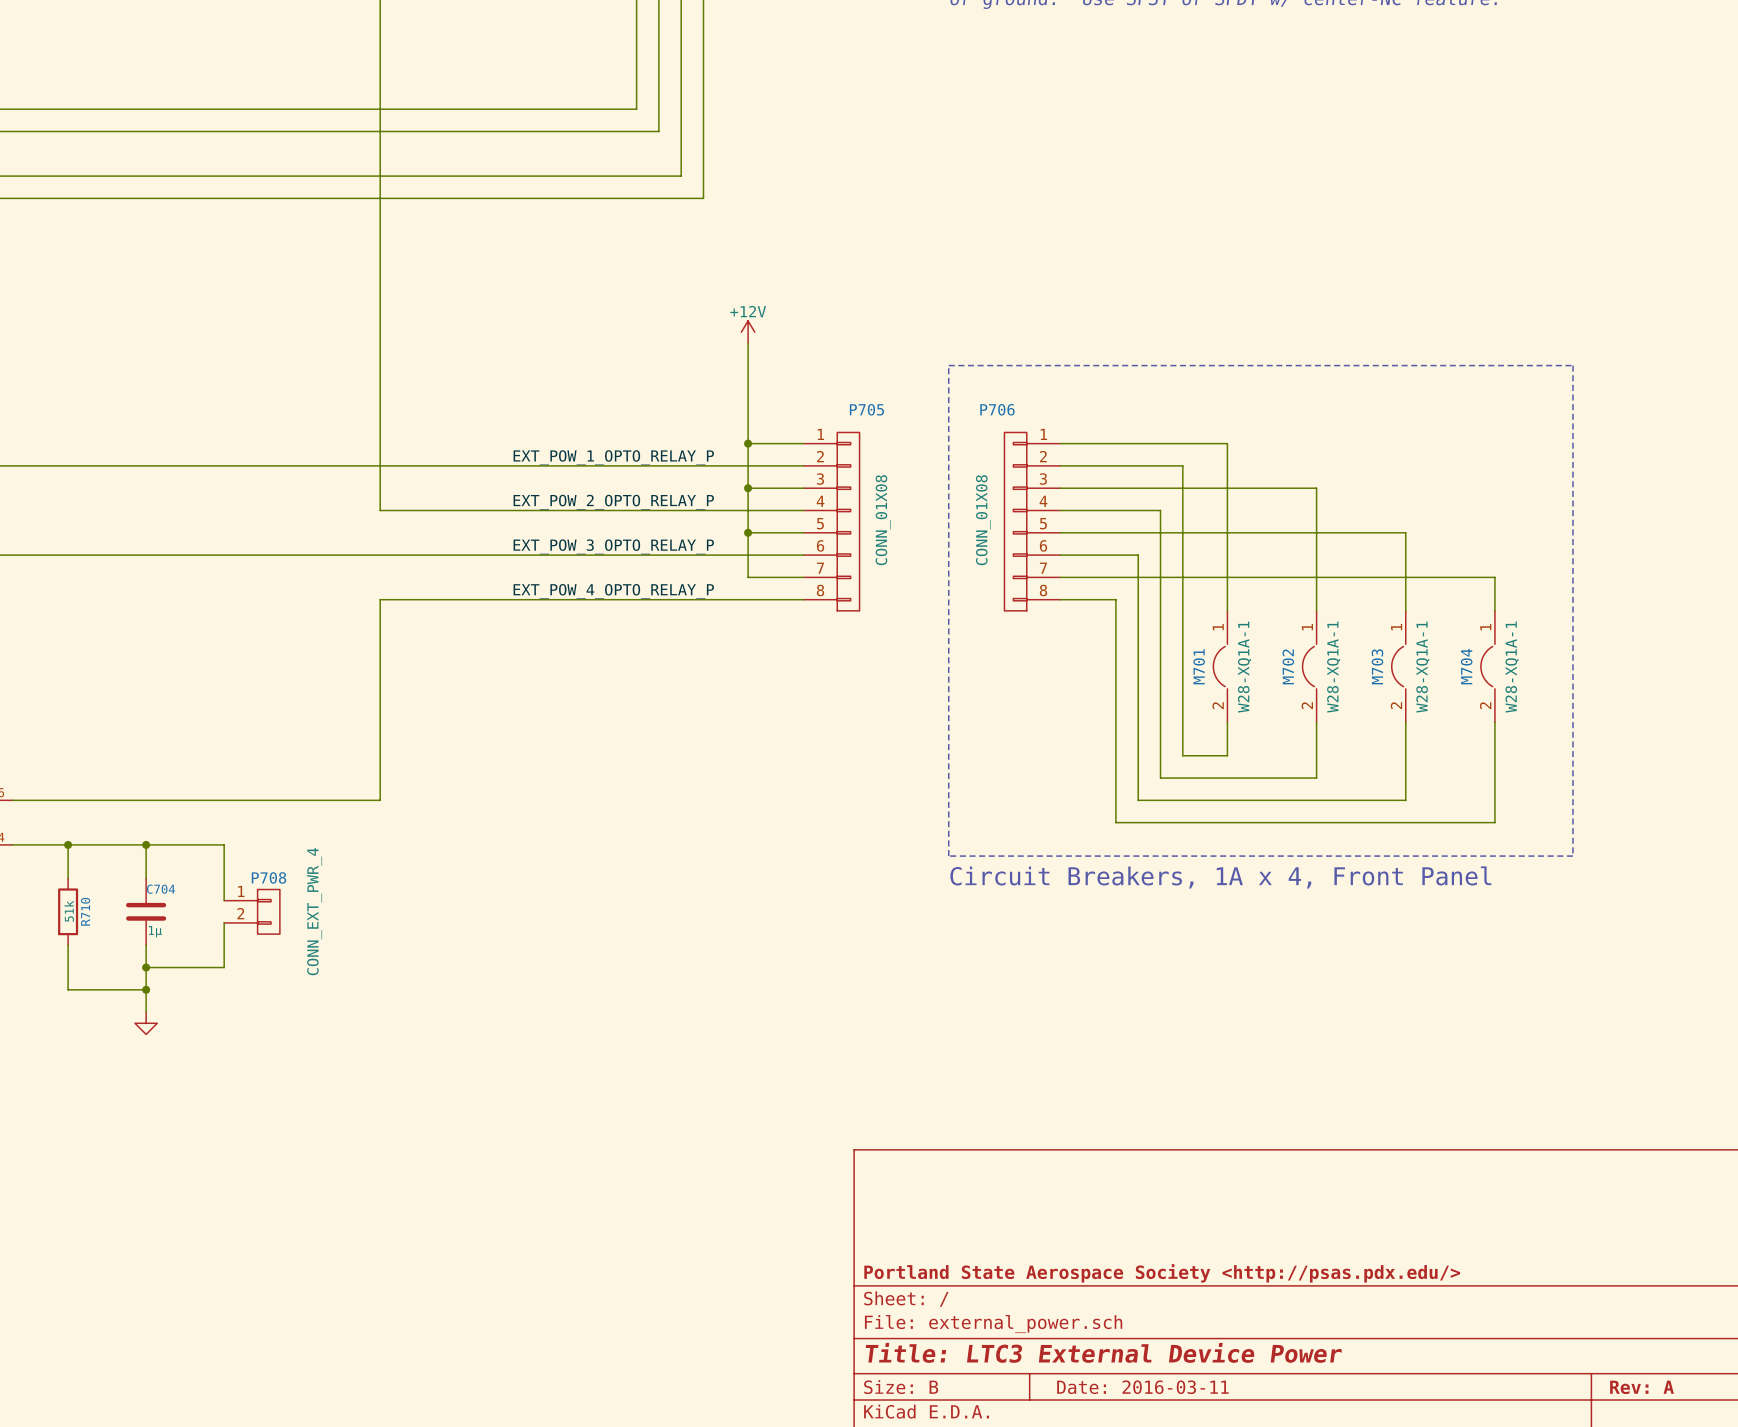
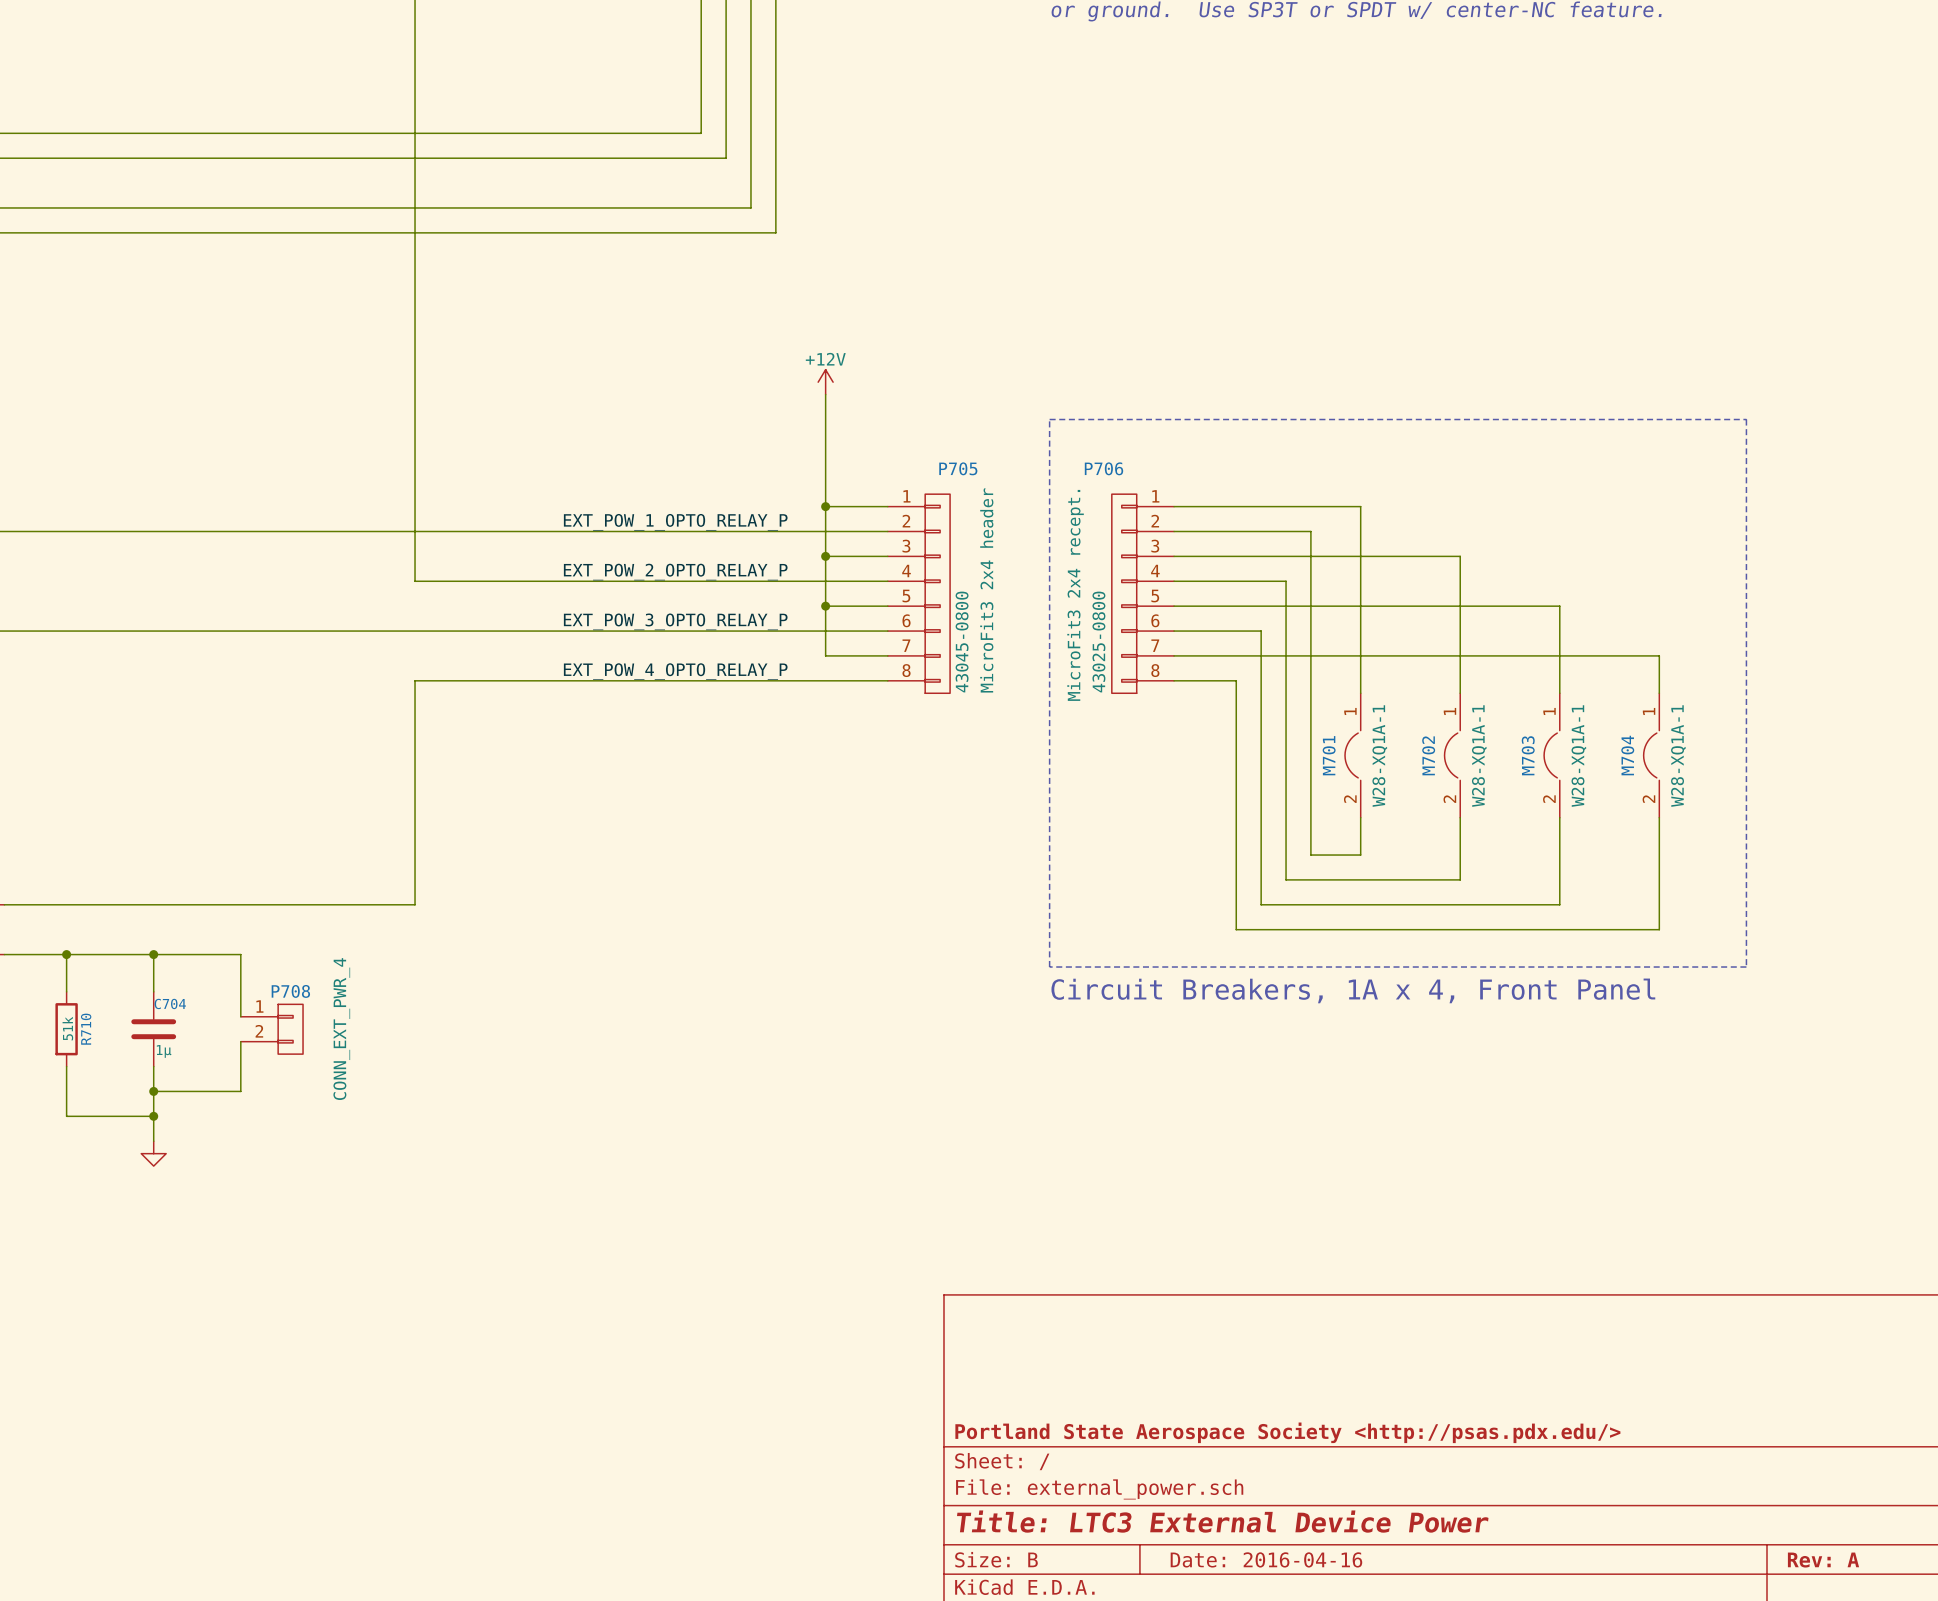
P705 text: none -> MicroFit3 2x4 header (986, 590)
P705 value: CONN_01X08 (883, 520) -> 43045-0800 (962, 642)
P706 value: CONN_01X08 (983, 520) -> 43025-0800 (1098, 642)
P706 text: none -> MicroFit3 2x4 recept. (1075, 595)
title block: Date: 2016-03-11 (1142, 1387) -> Date: 2016-04-16 (1266, 1559)

